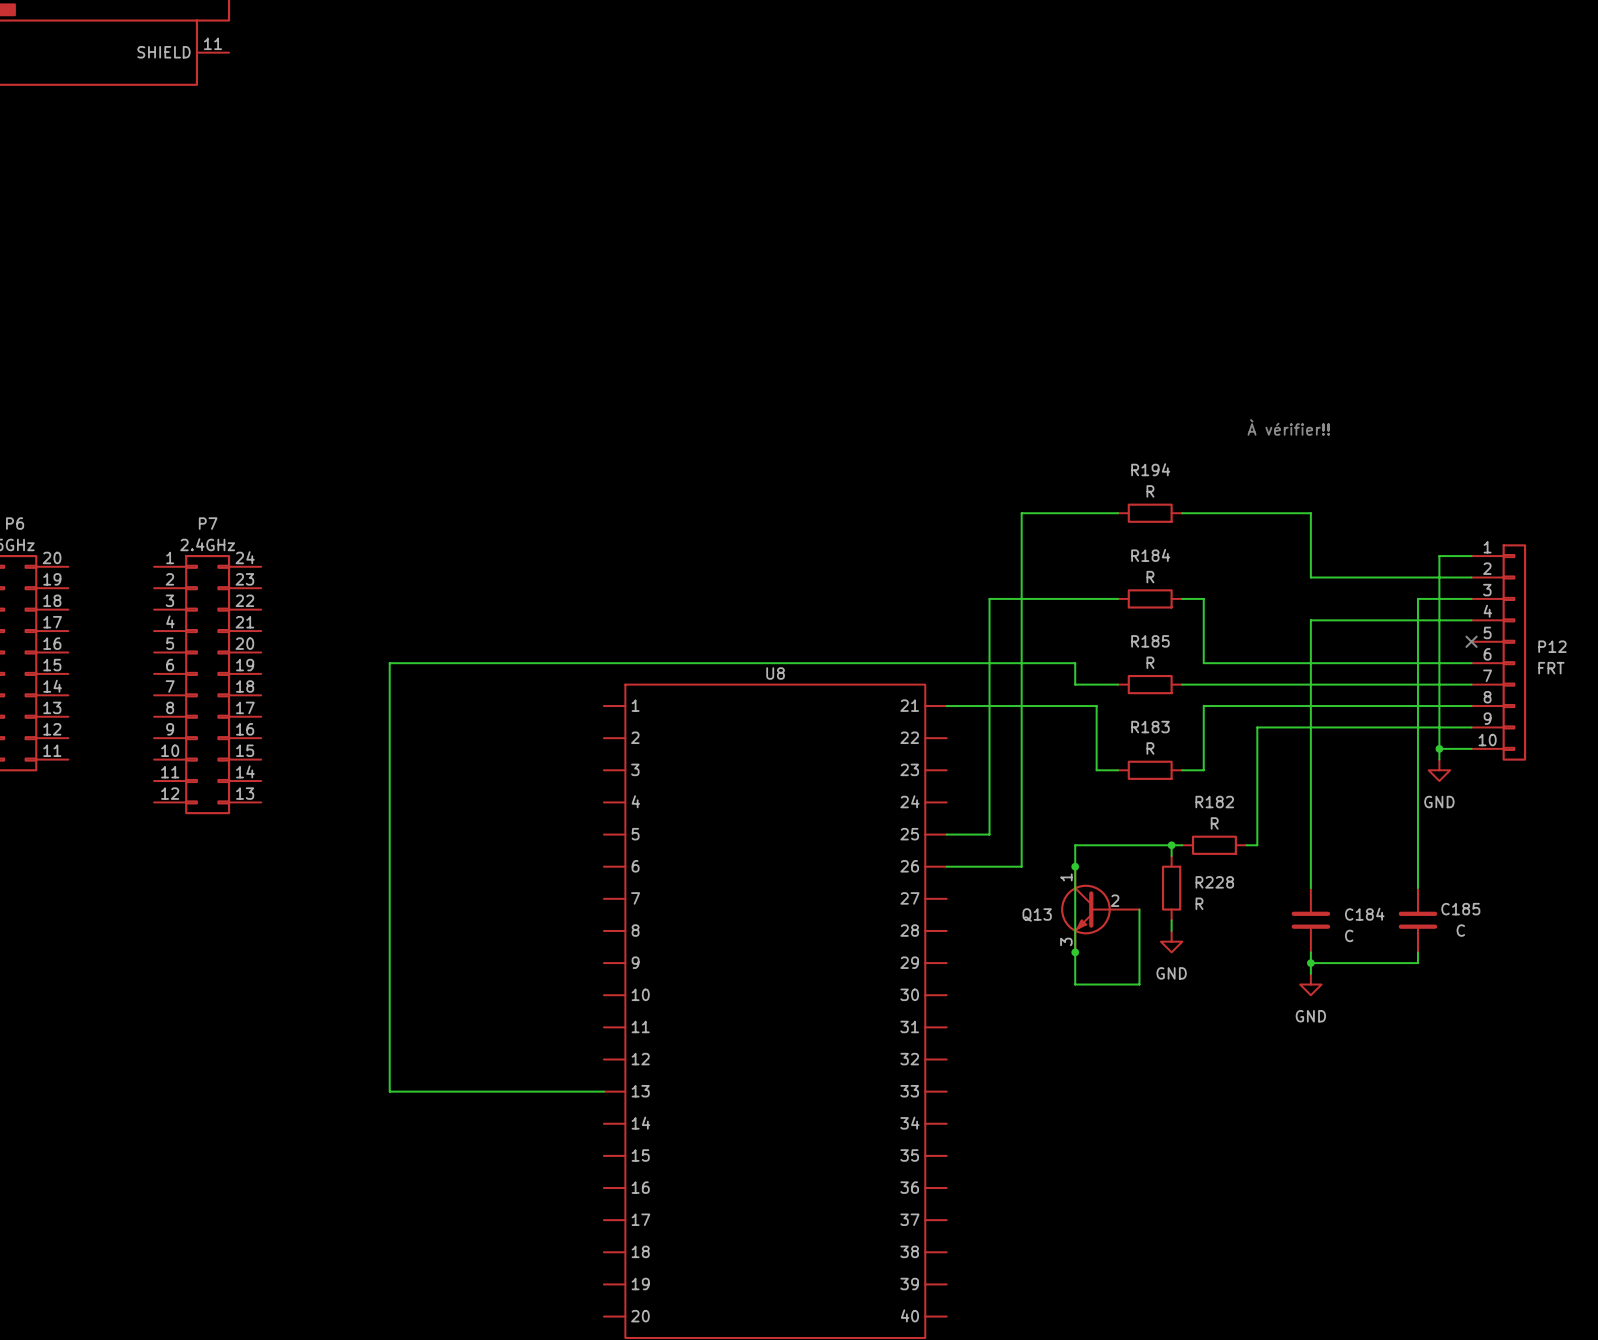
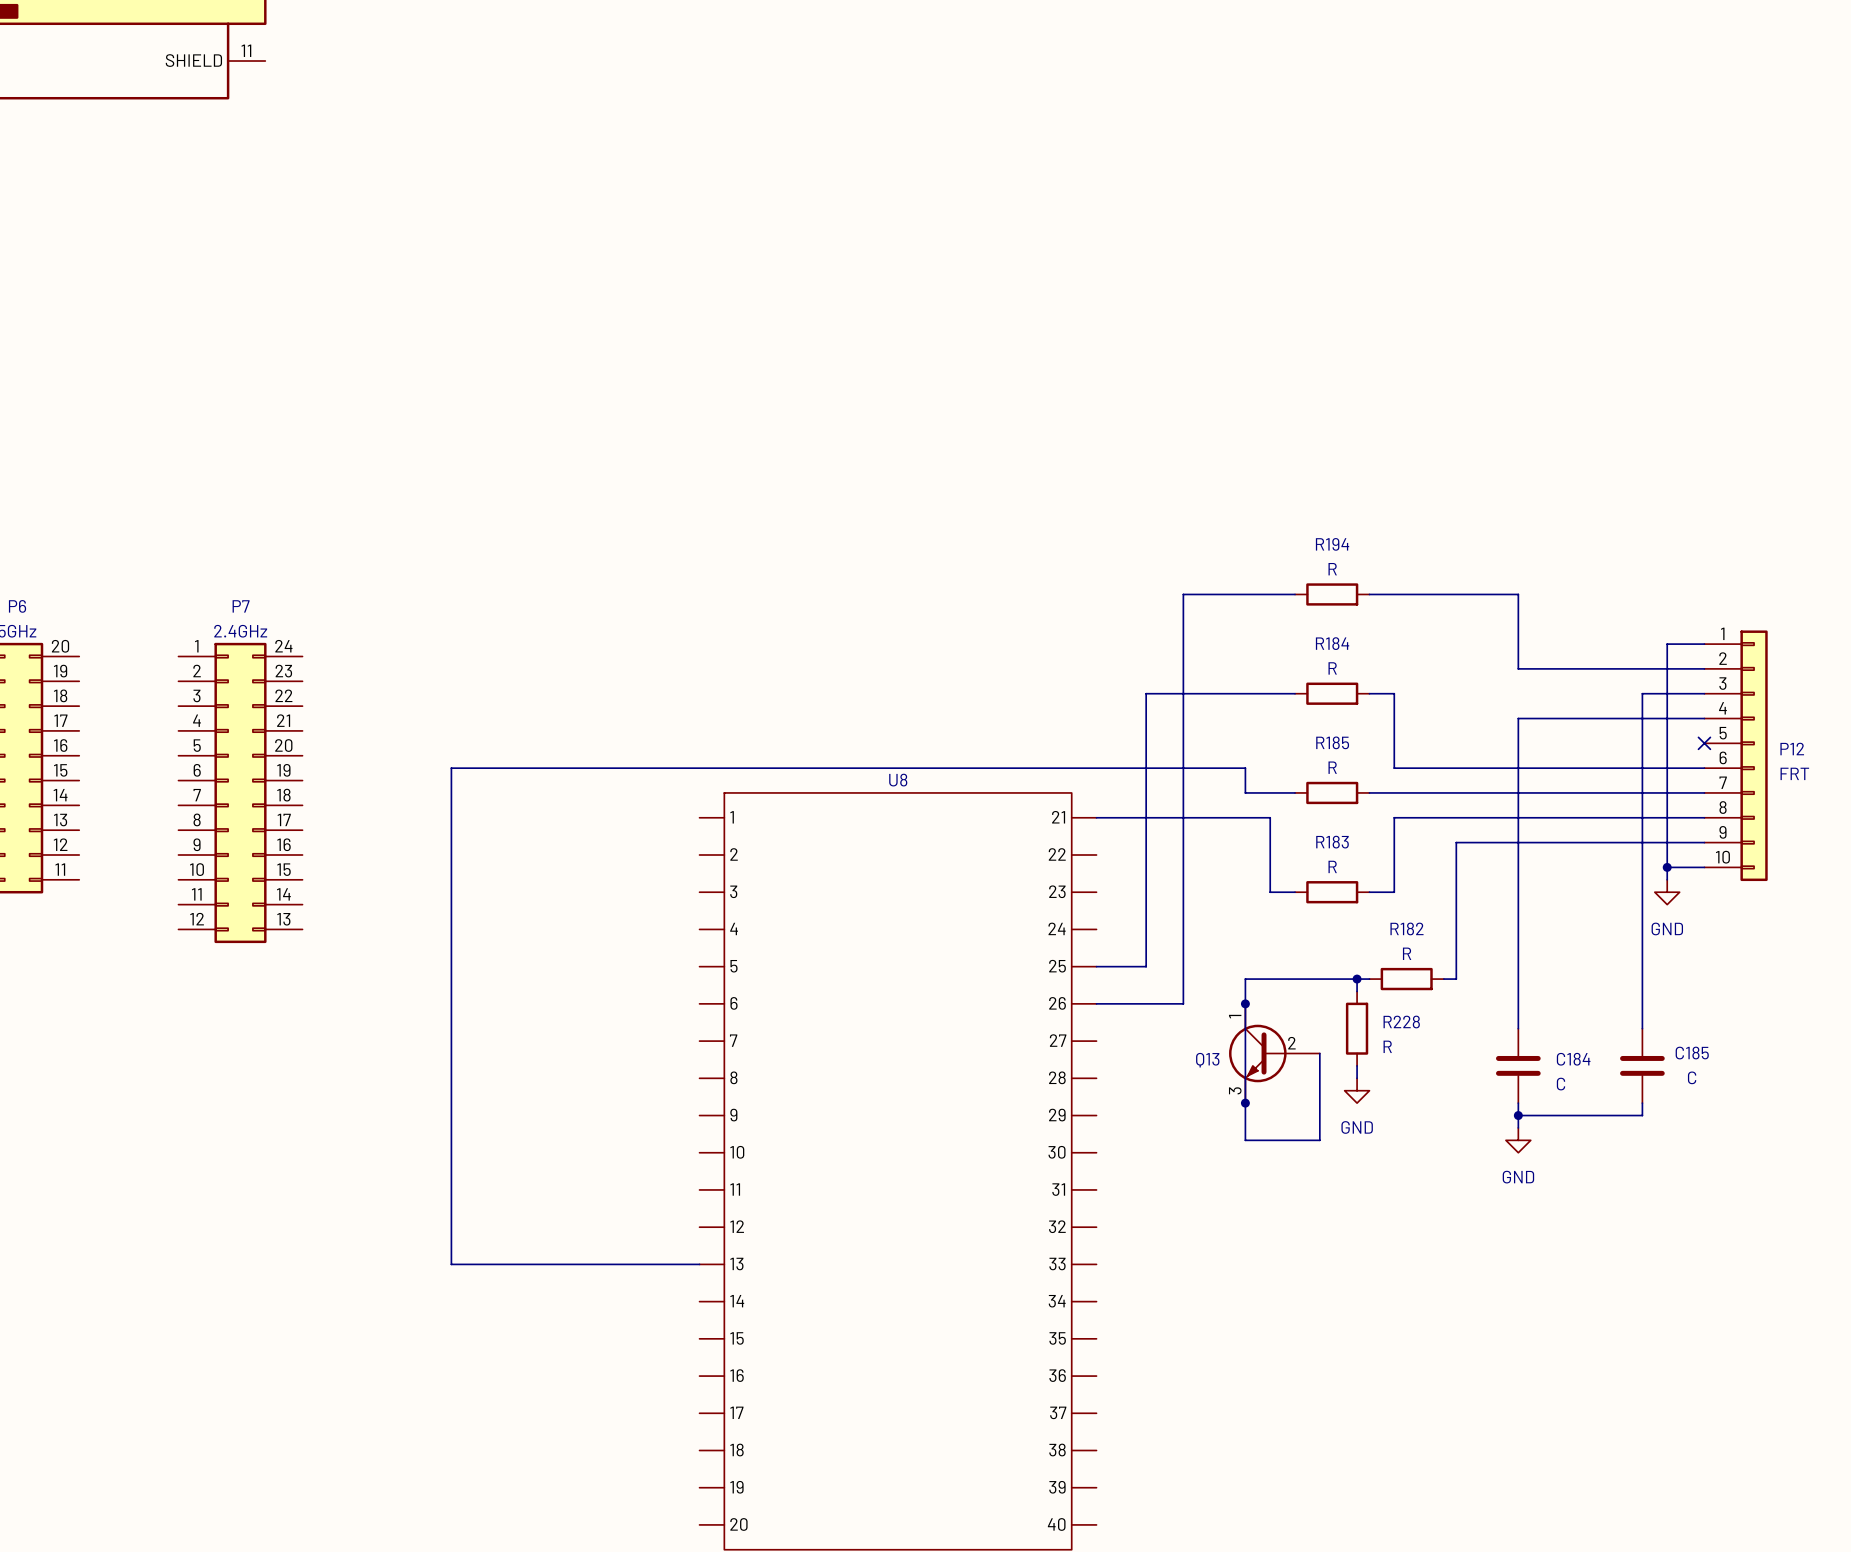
text: À vérifier!! (1288, 427) -> none

